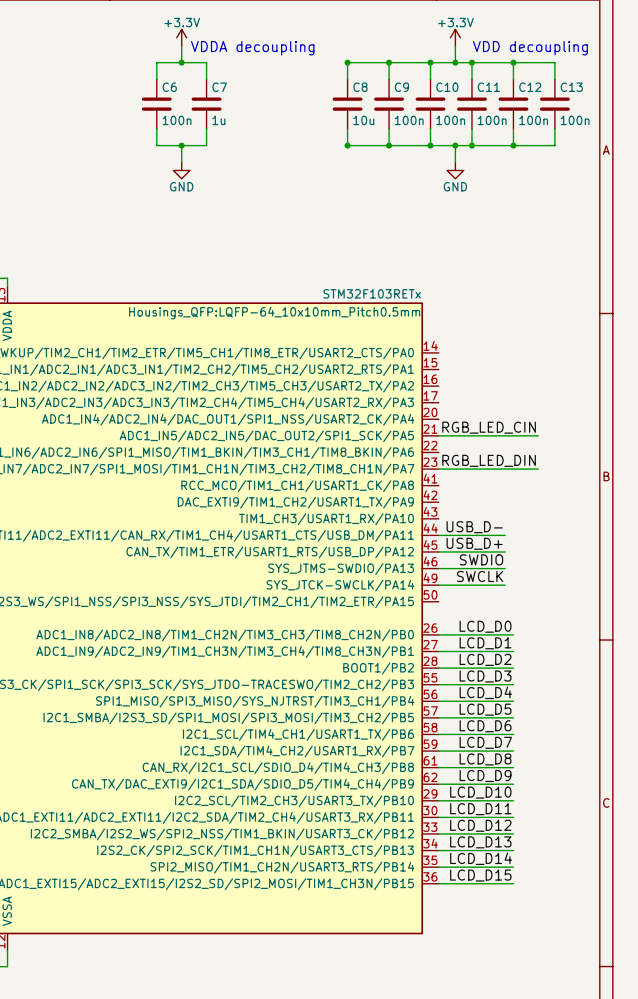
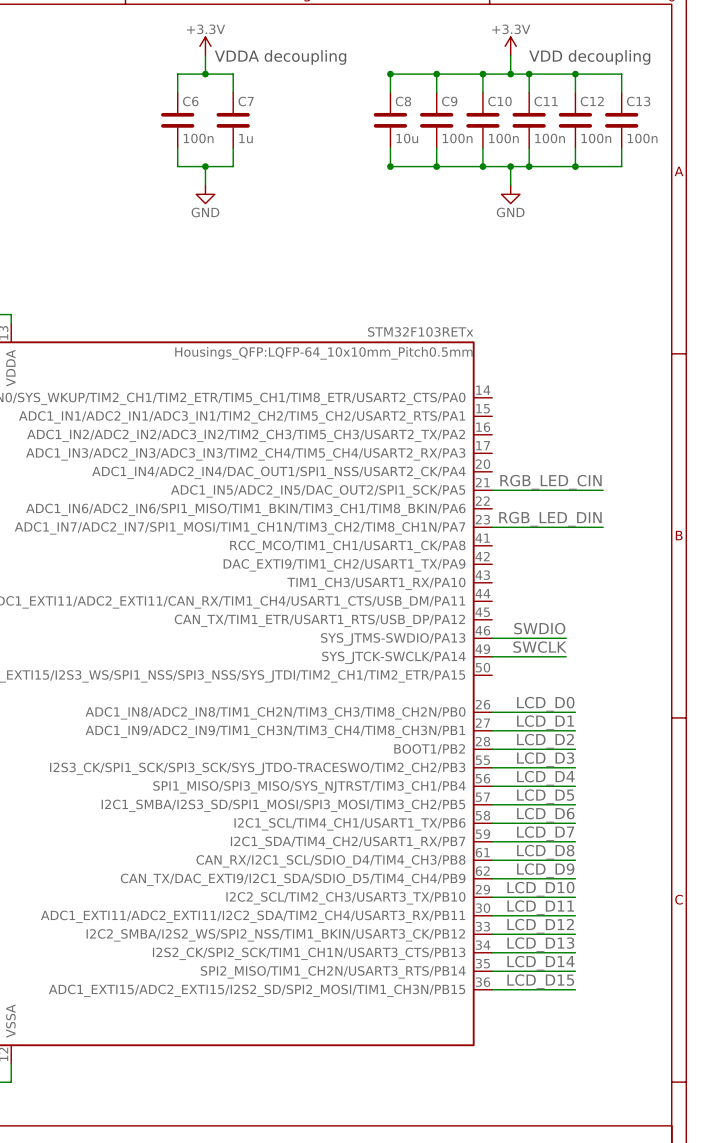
label: USB_D- (474, 527) -> none
wire: (438, 535) (505, 535) -> none
label: USB_D+ (474, 543) -> none
wire: (438, 551) (505, 551) -> none

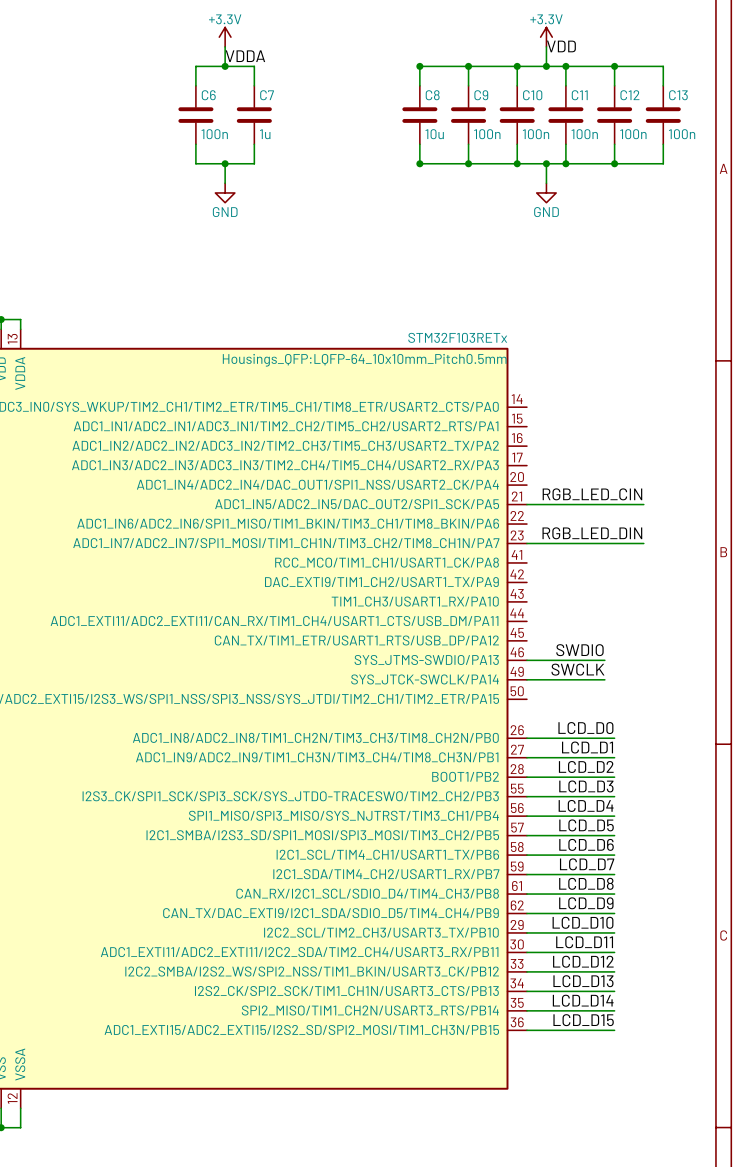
label: none -> VDD (561, 46)
text: VDDA decoupling (280, 57) -> none
text: VDD decoupling (589, 57) -> none
label: none -> VDDA (245, 56)

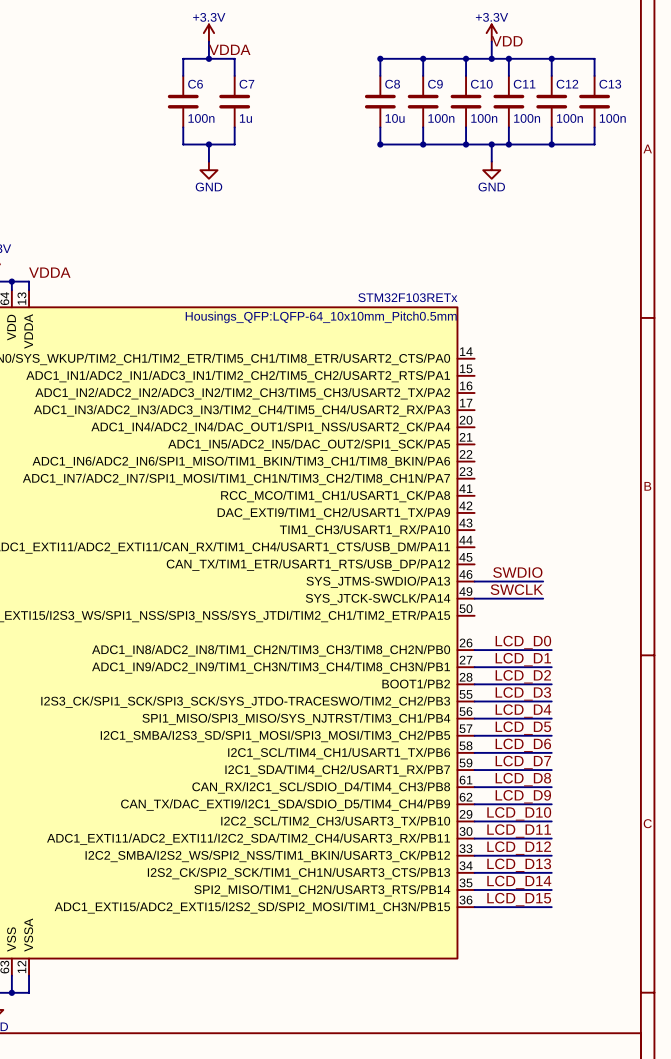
label: none -> VDDA (49, 272)
label: RGB_LED_CIN (592, 494) -> none
wire: (526, 504) (643, 504) -> none
label: RGB_LED_DIN (592, 533) -> none
wire: (526, 543) (643, 543) -> none

